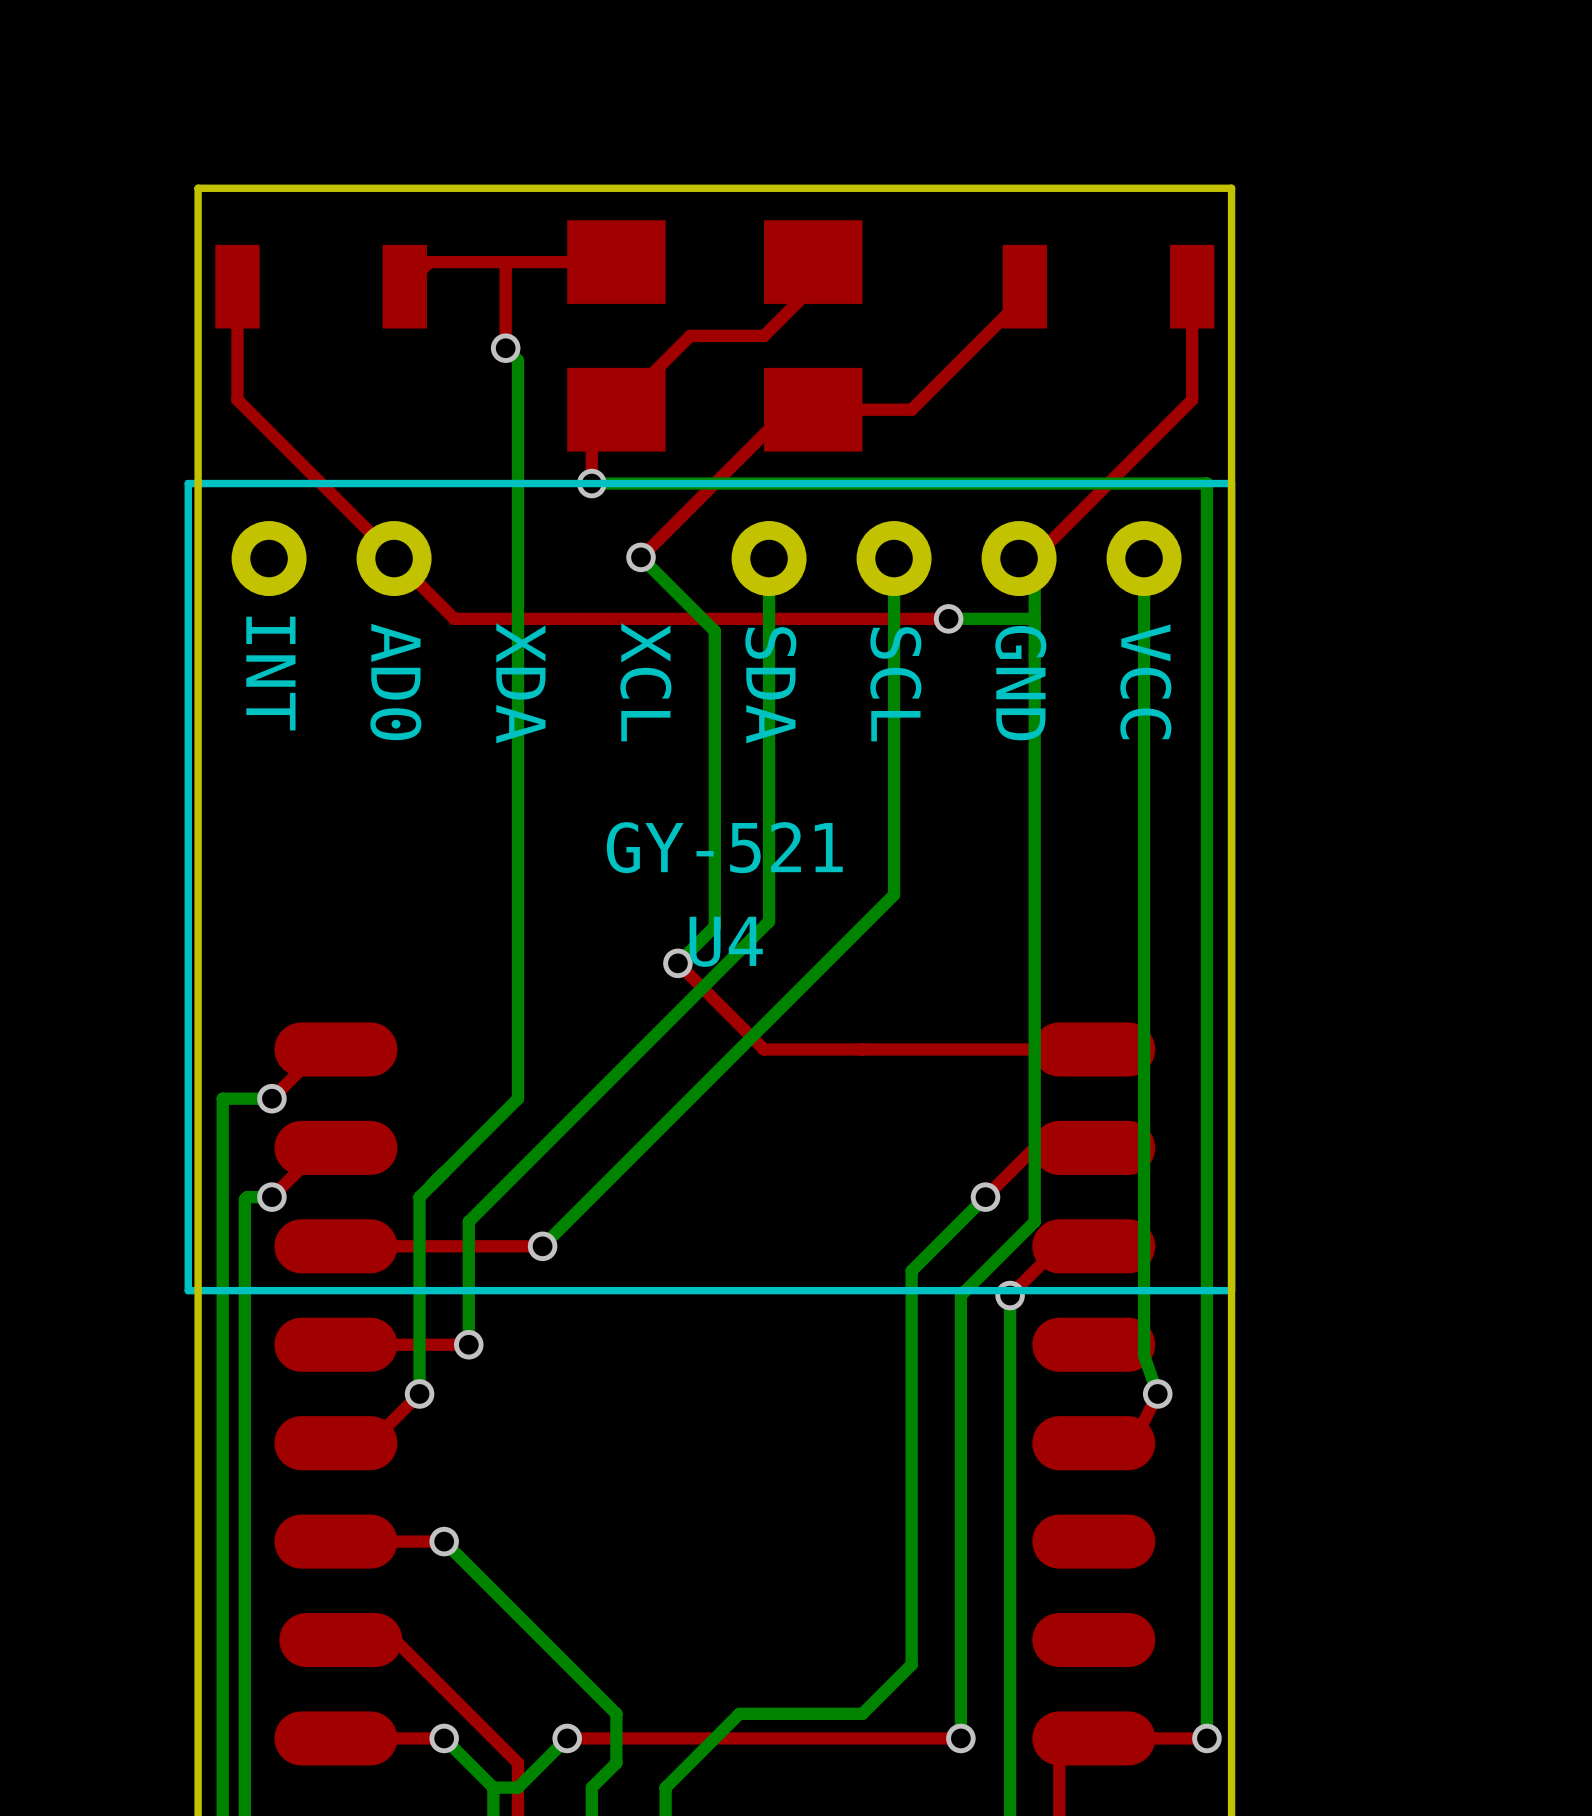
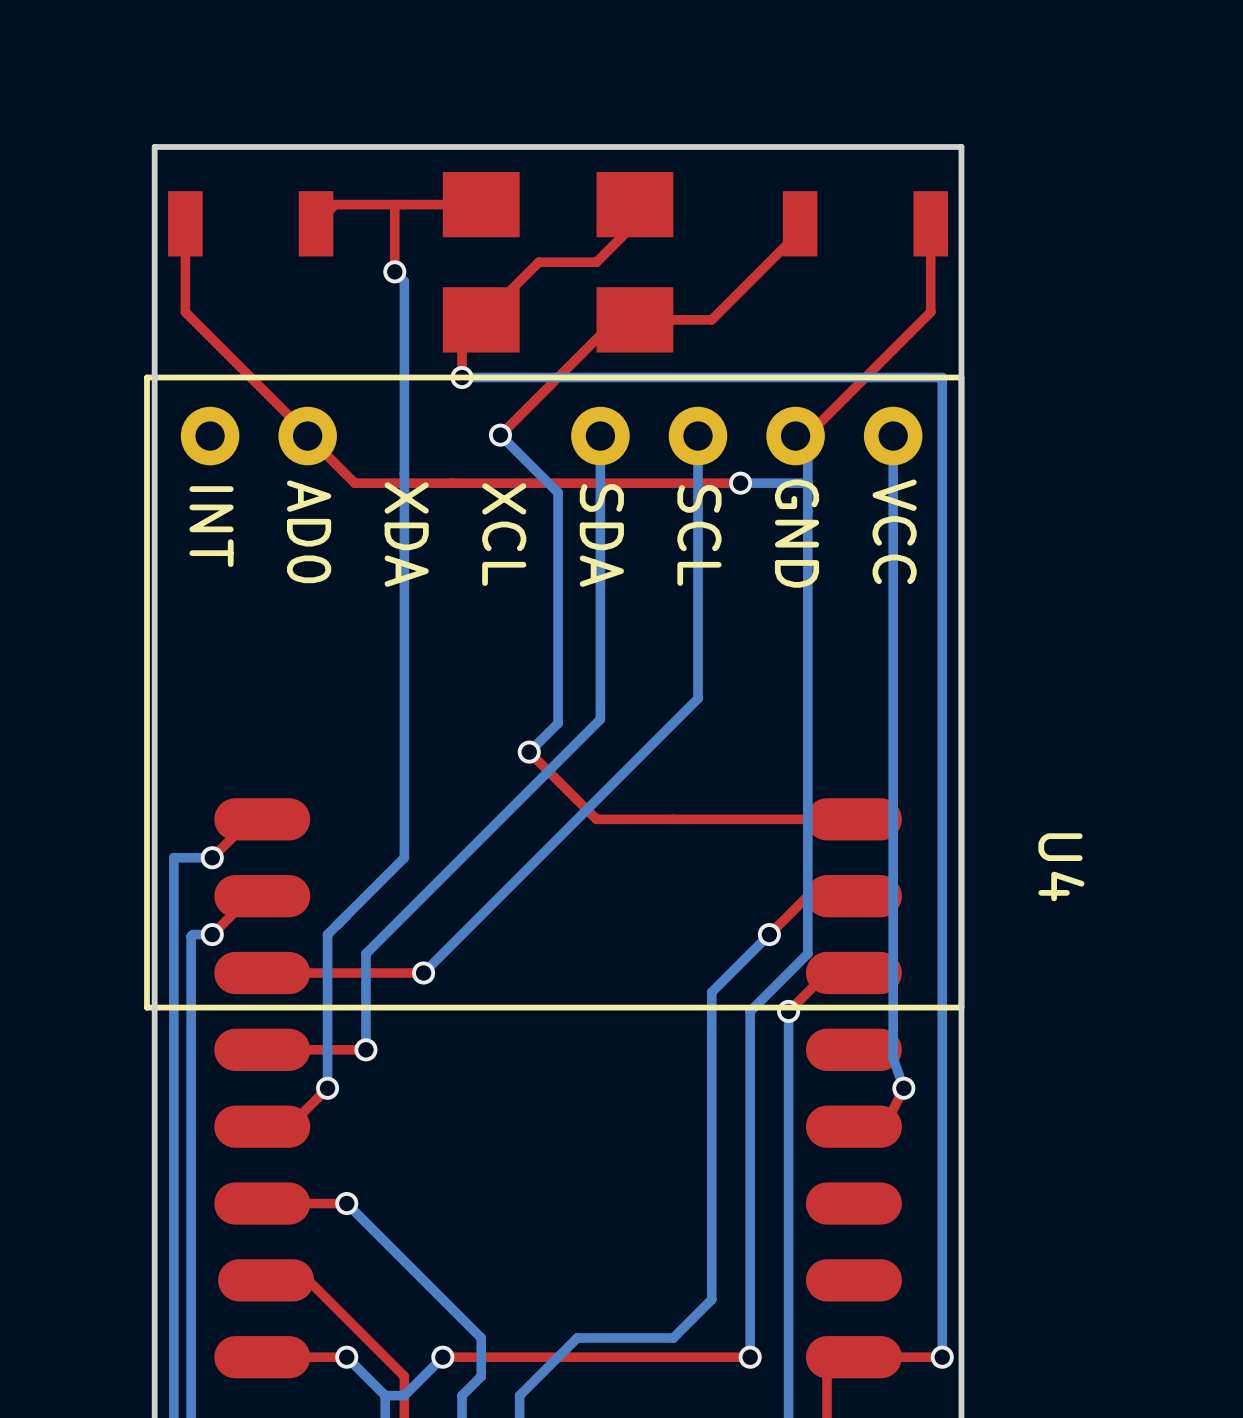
U4 value: GY-521 (724, 847) -> none
U4 name rotation: 0° (726, 941) -> 90° clockwise (1061, 867)
U4 name position: U4 (726, 941) -> U4 (1061, 867)

